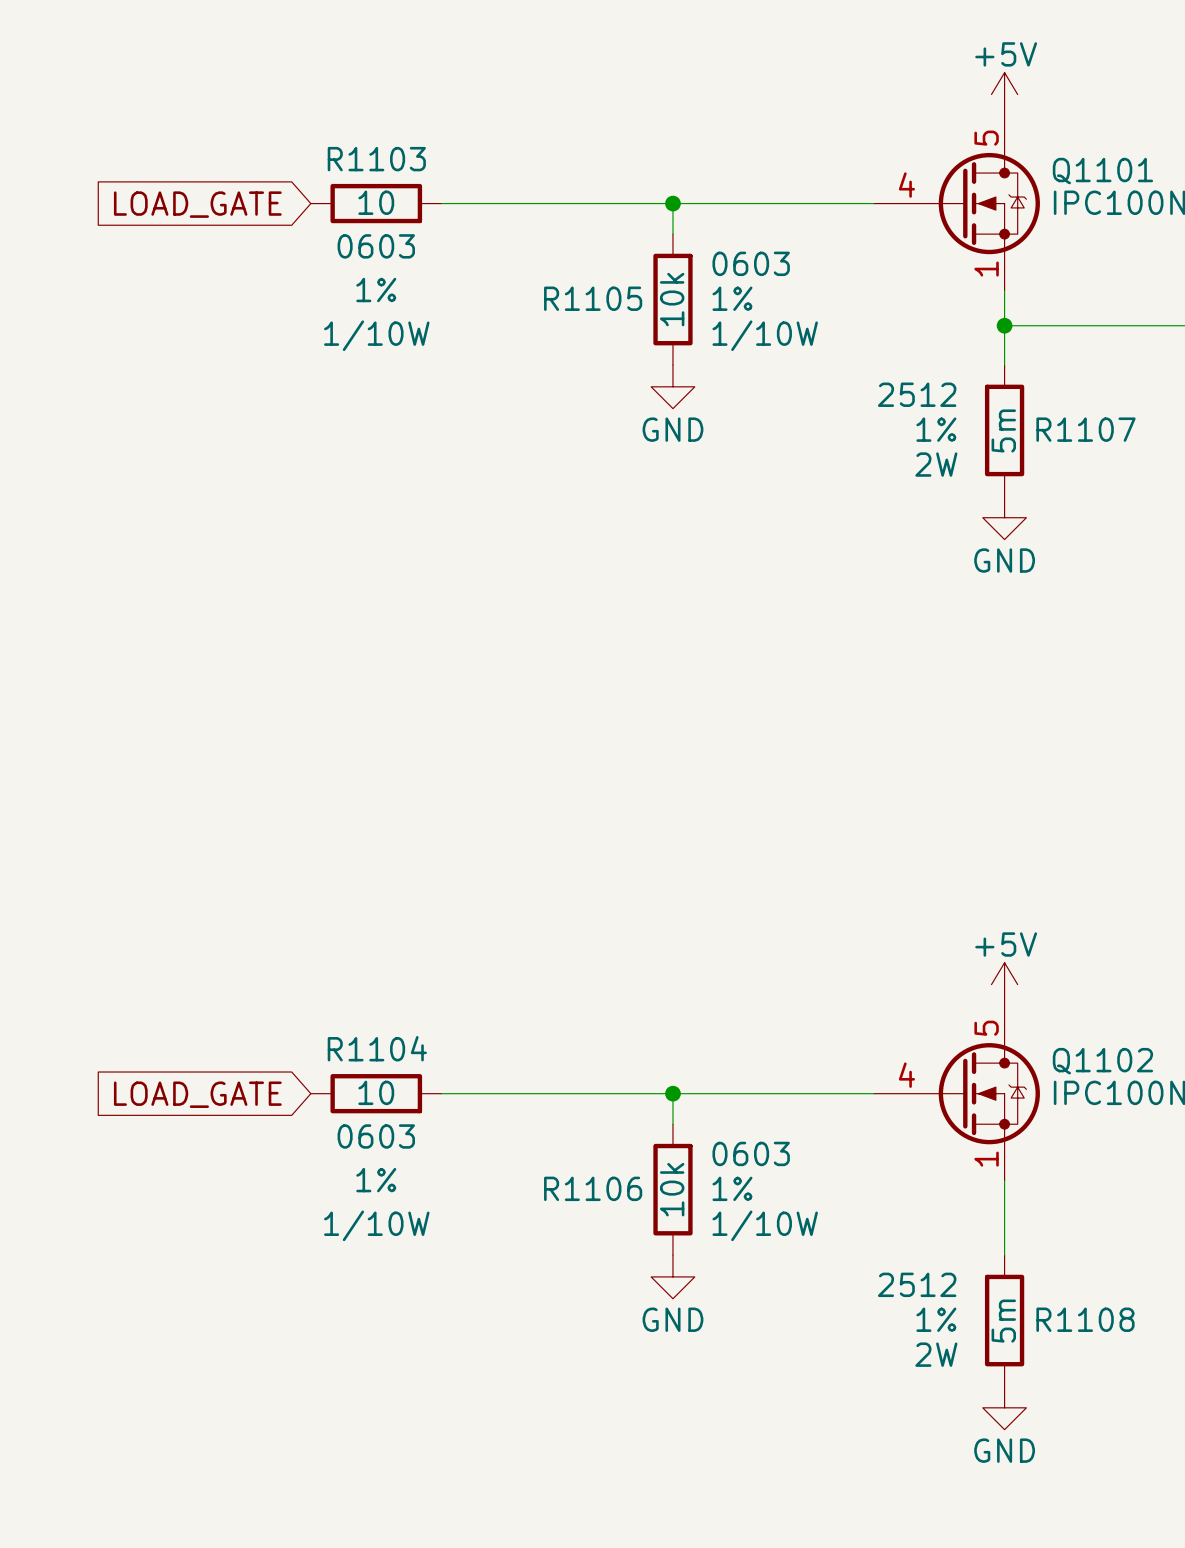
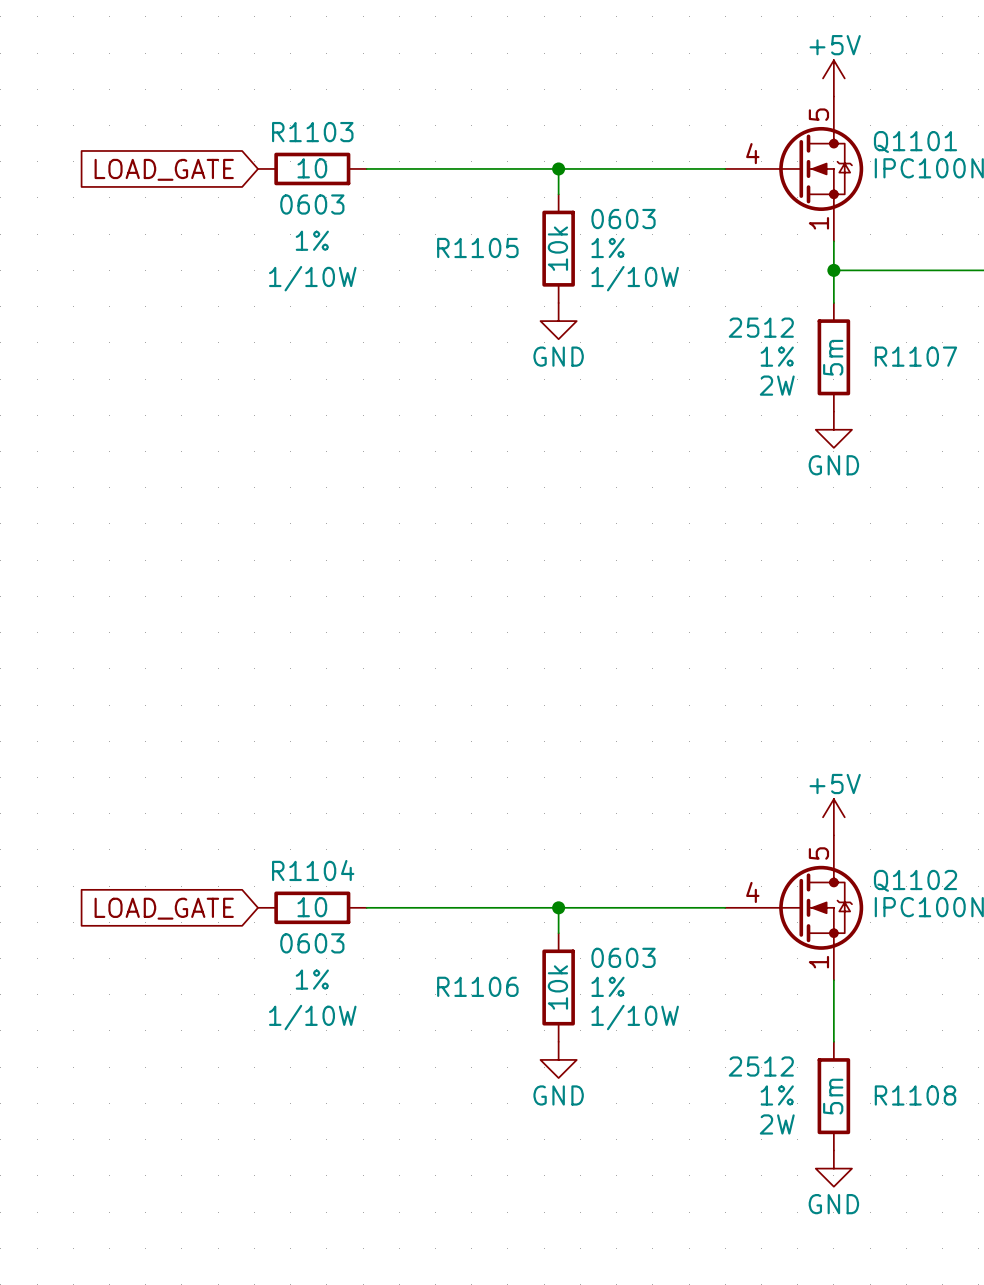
R1105 name position: R1105 (593, 298) -> R1105 (477, 247)
R1107 name position: R1107 (1085, 429) -> R1107 (915, 356)
R1106 name position: R1106 (593, 1188) -> R1106 (477, 986)
R1108 name position: R1108 (1085, 1319) -> R1108 (915, 1095)

